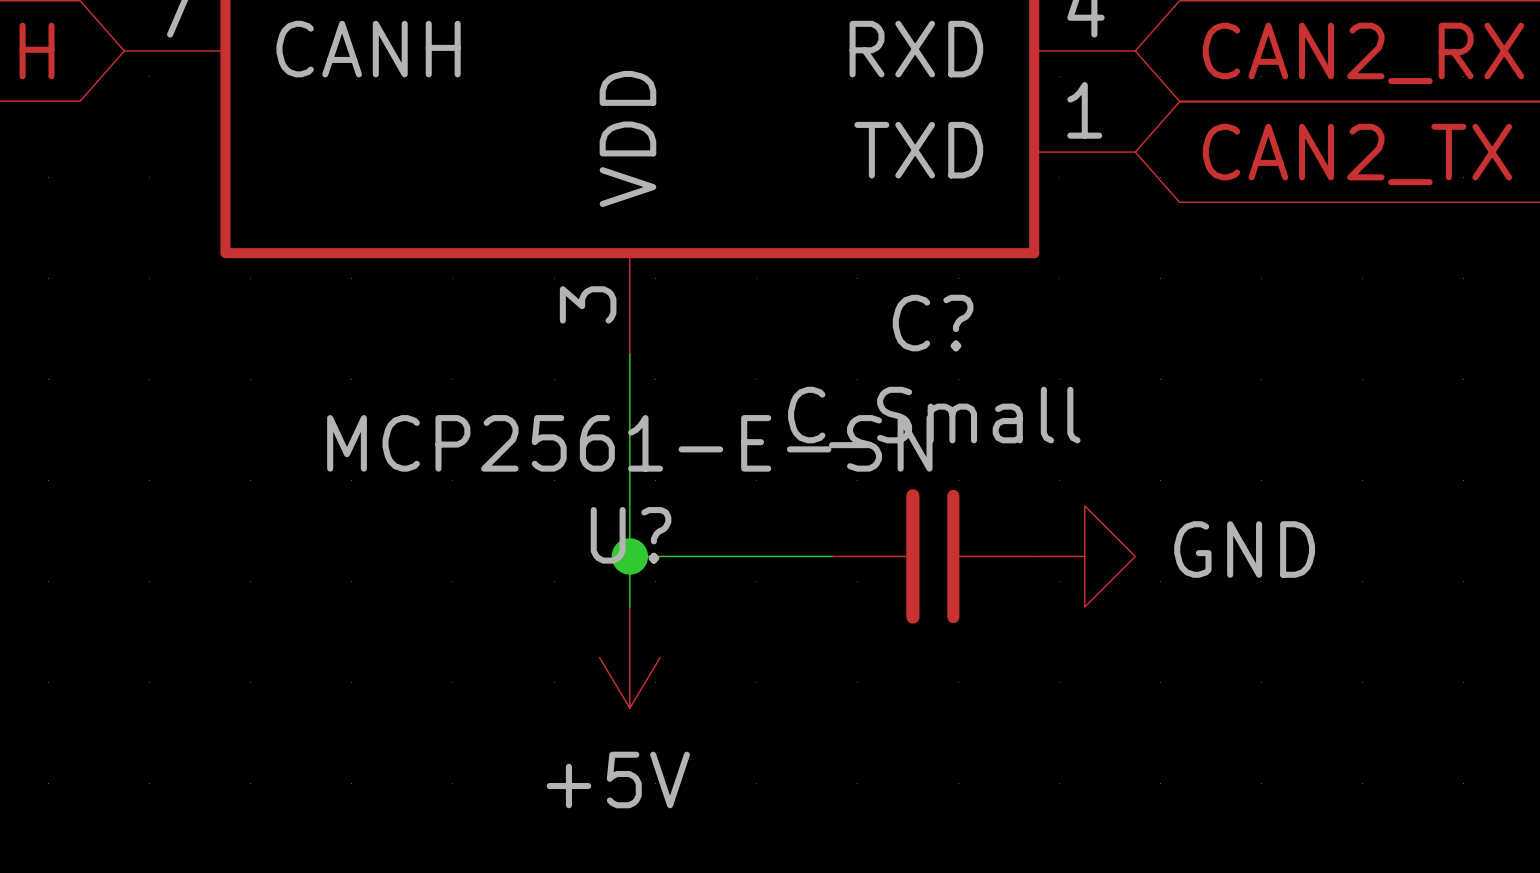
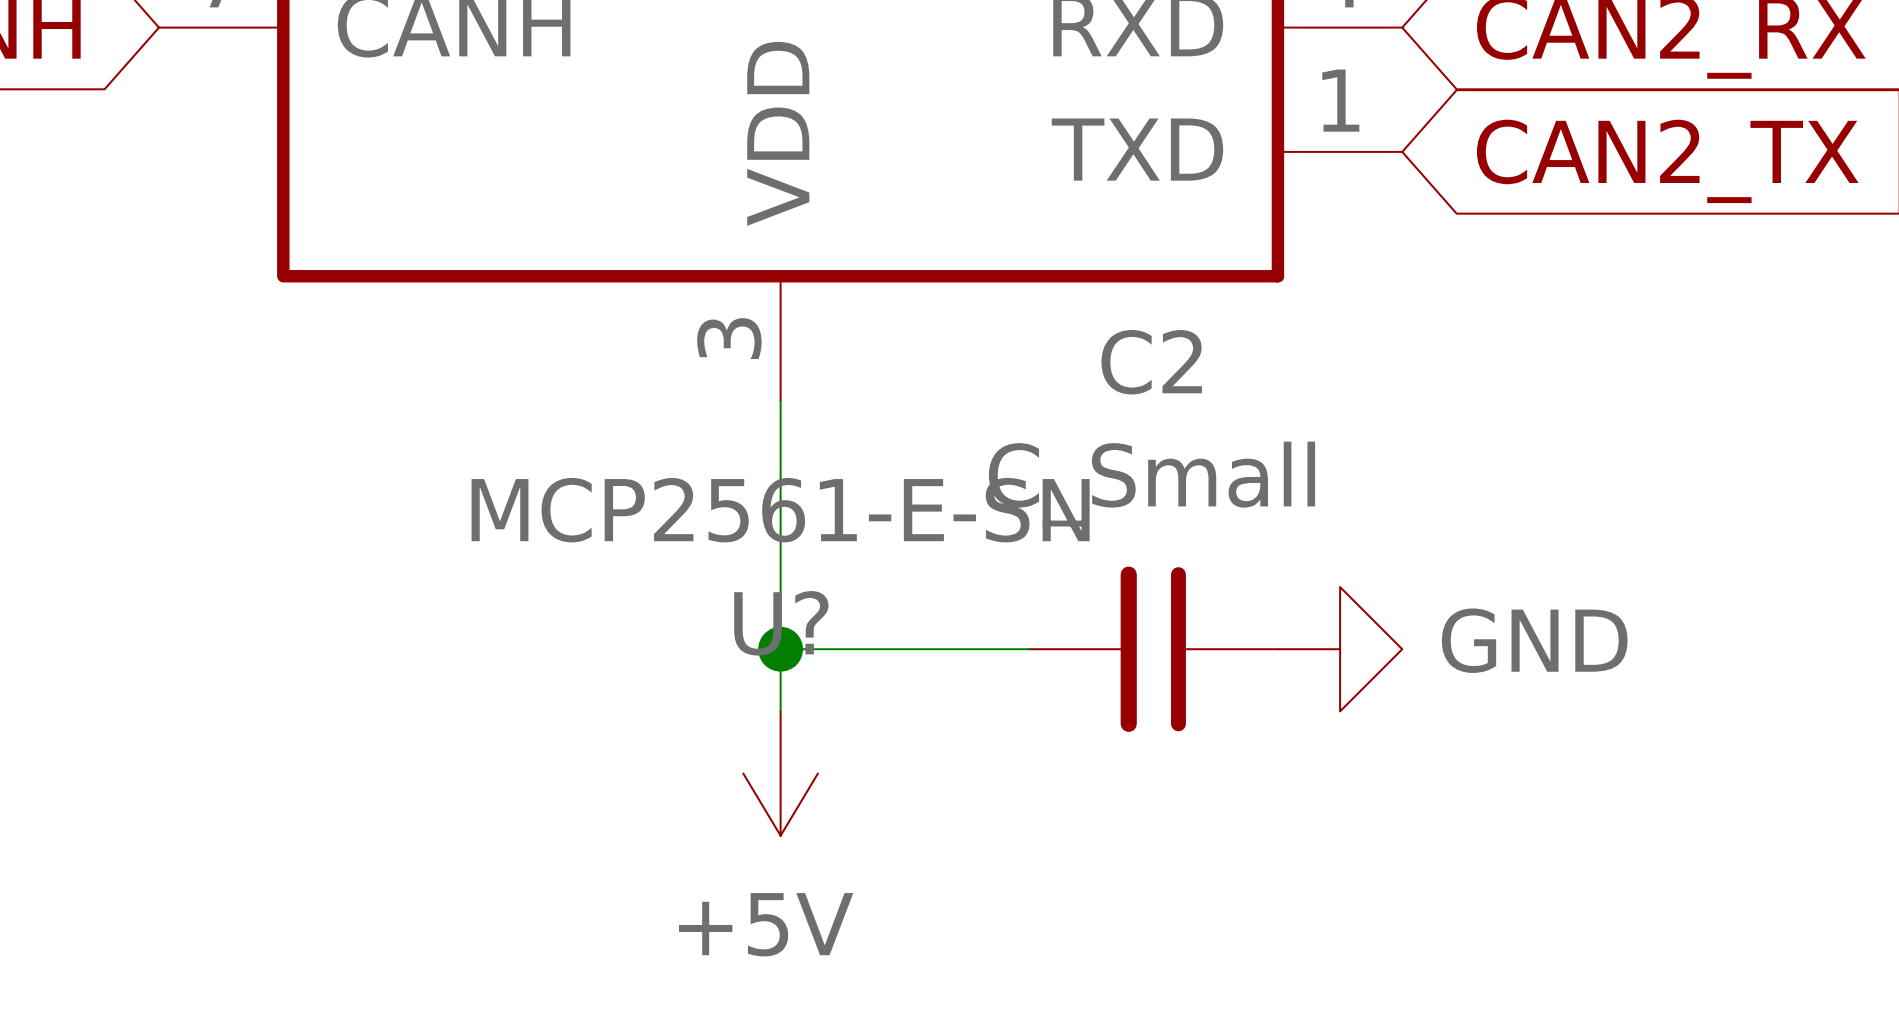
C? name: C? (933, 323) -> C2 (1151, 362)

